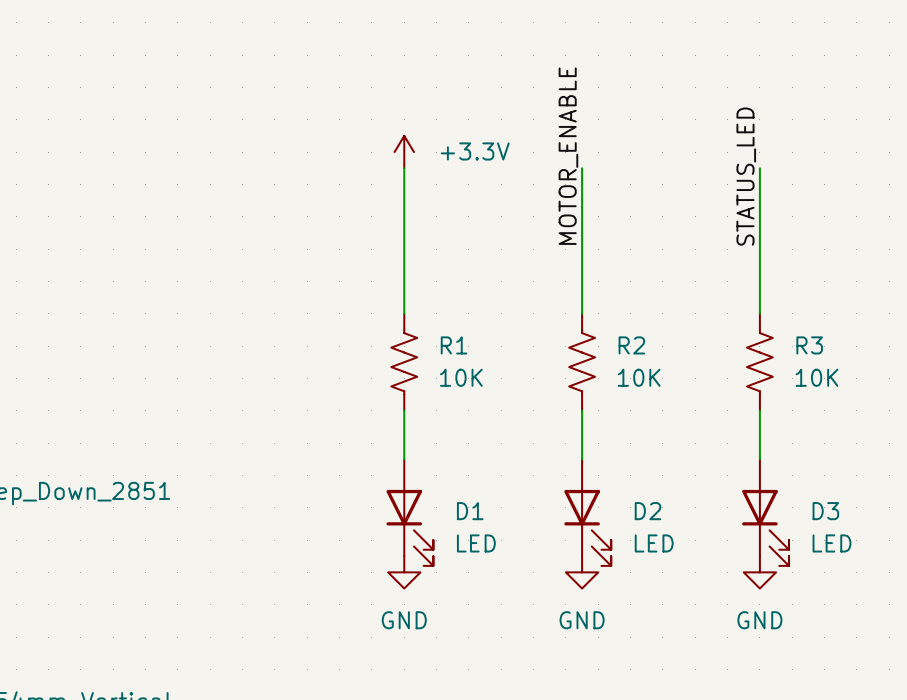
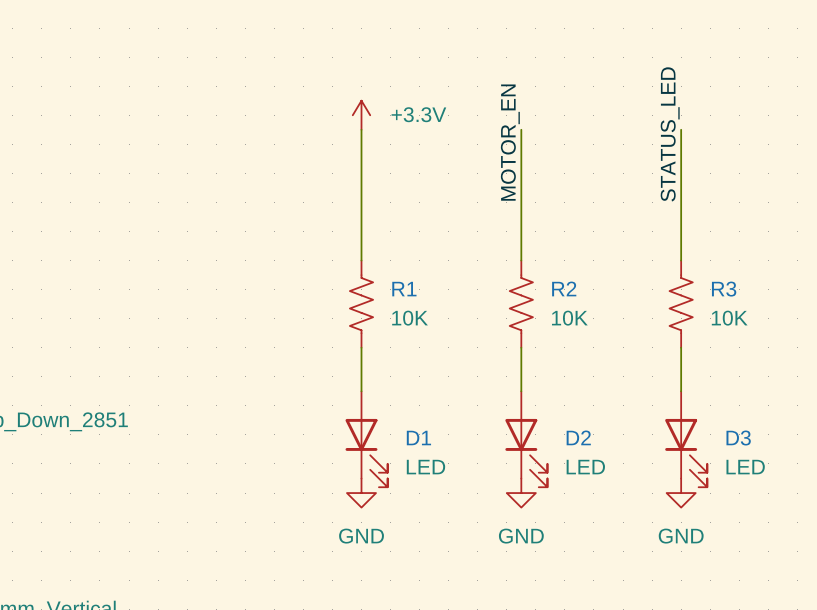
label: MOTOR_ENABLE (568, 156) -> MOTOR_EN (510, 142)

